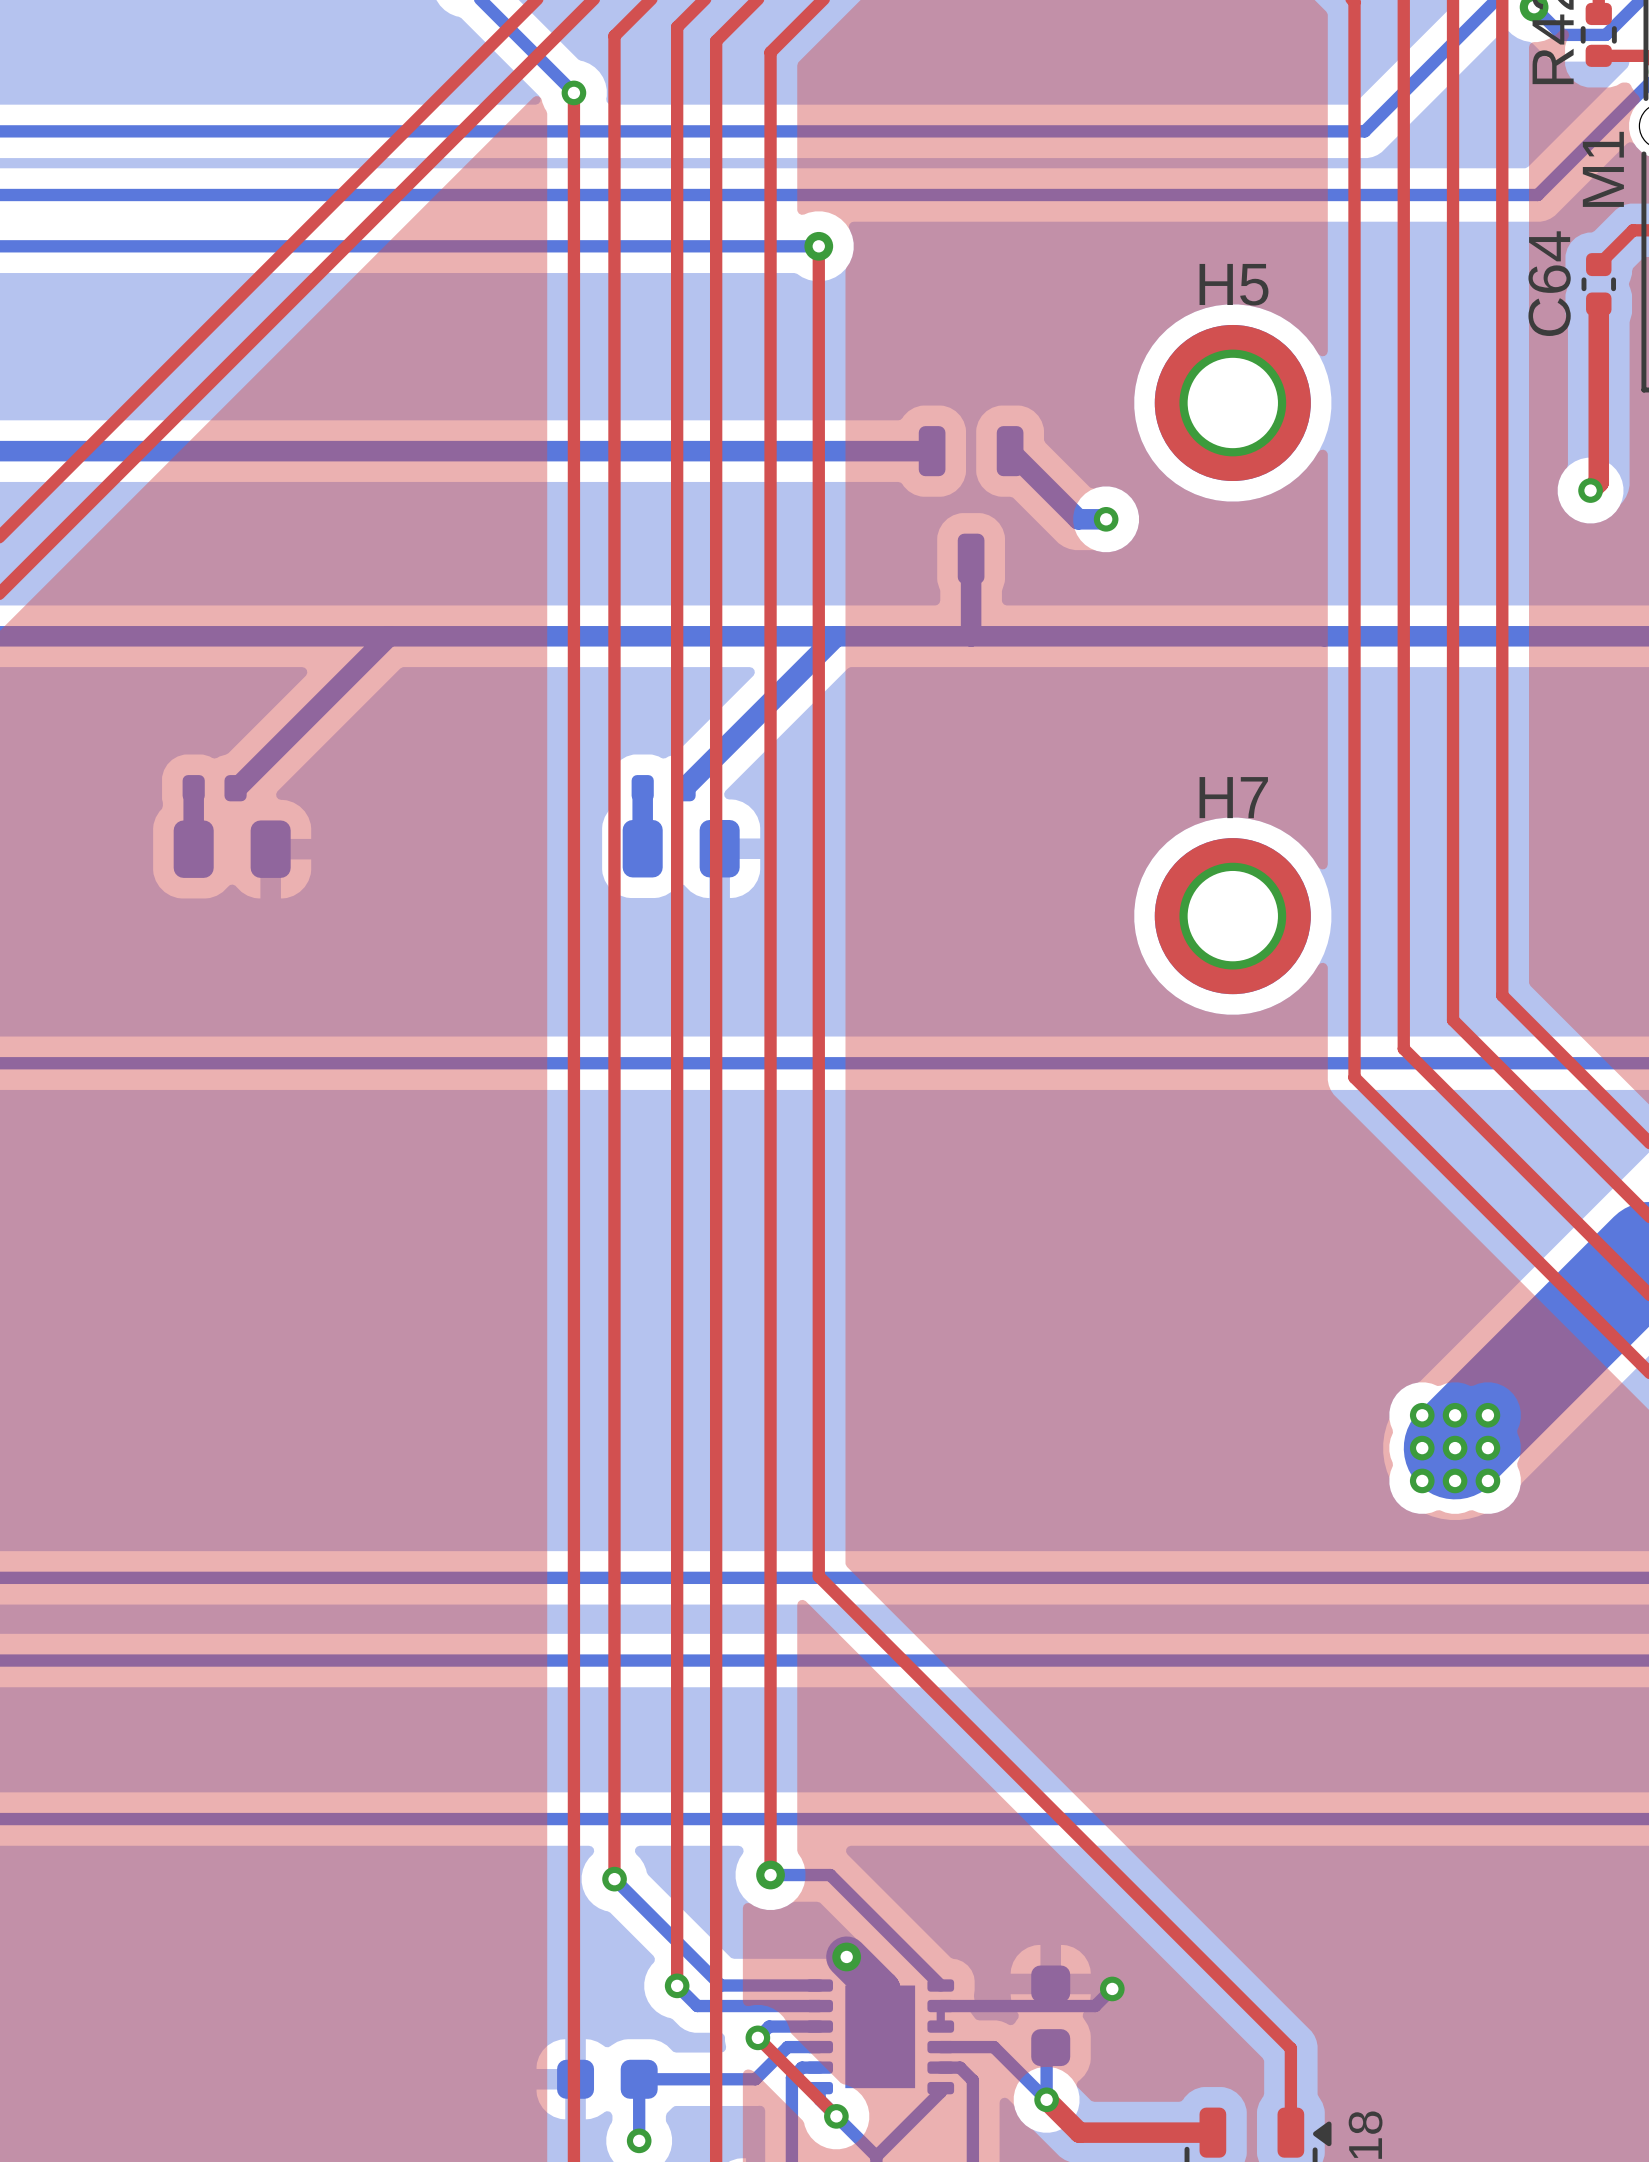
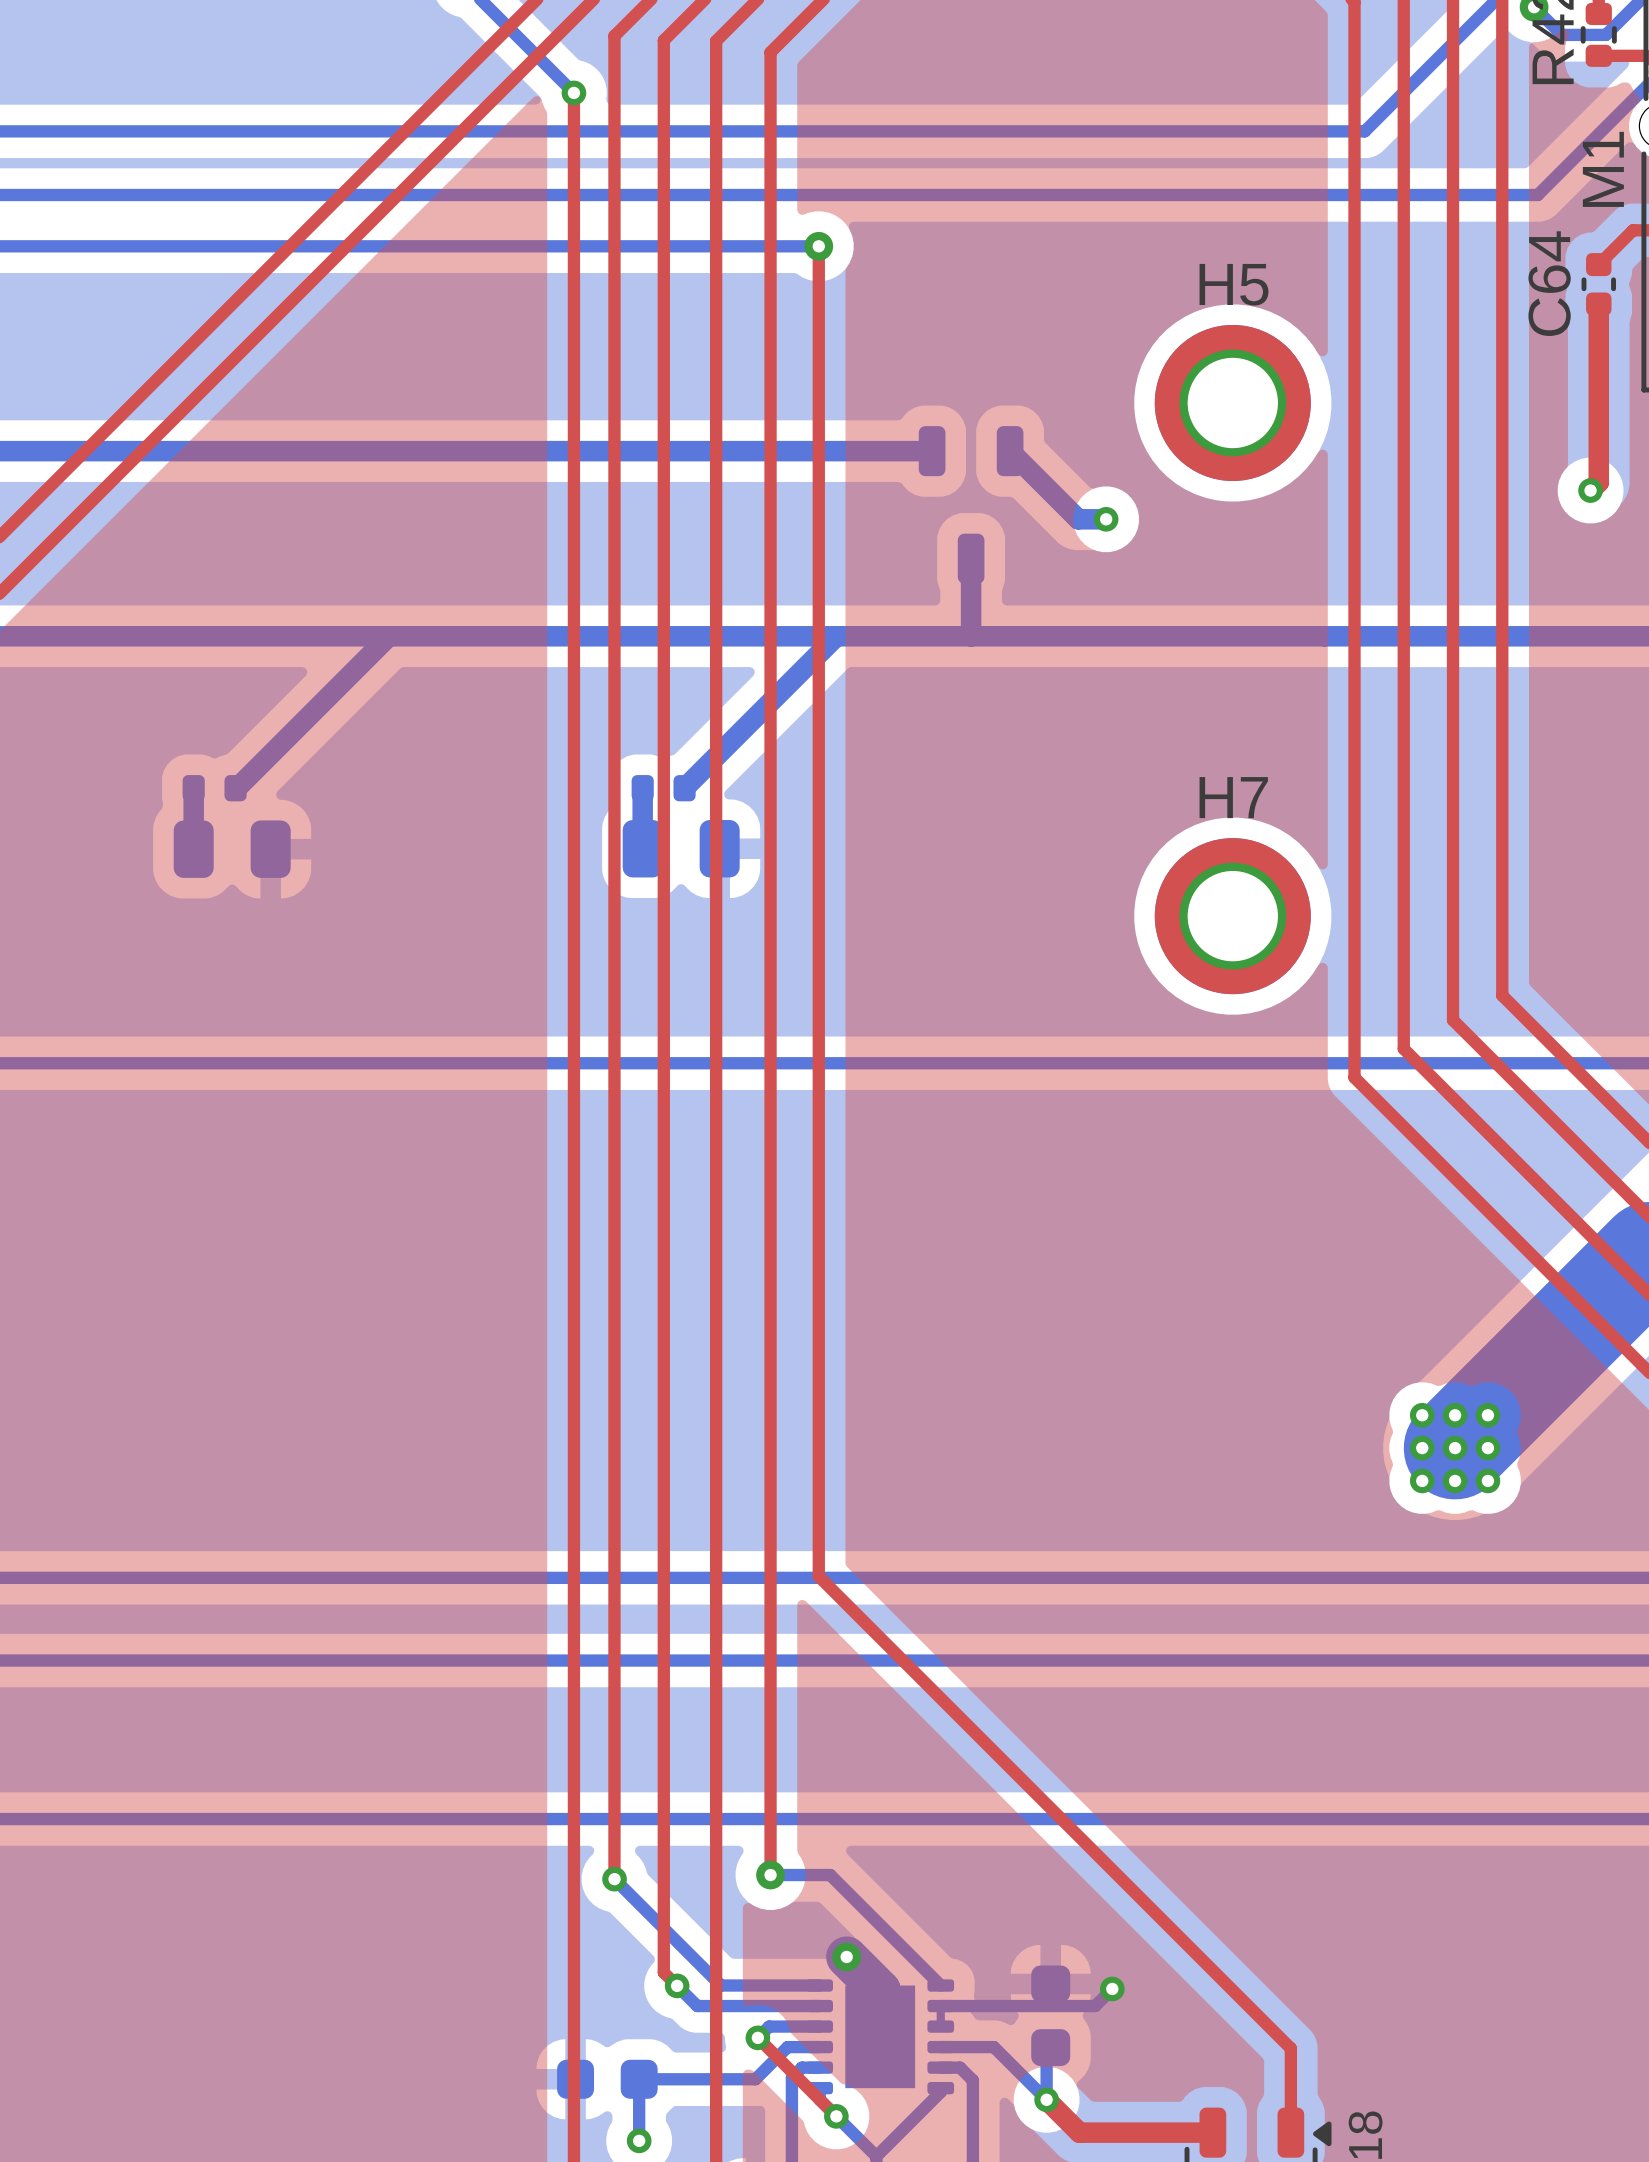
top track: (677, 27) (677, 1985) -> (677, 27) (663, 40) (663, 1972) (677, 1985)

